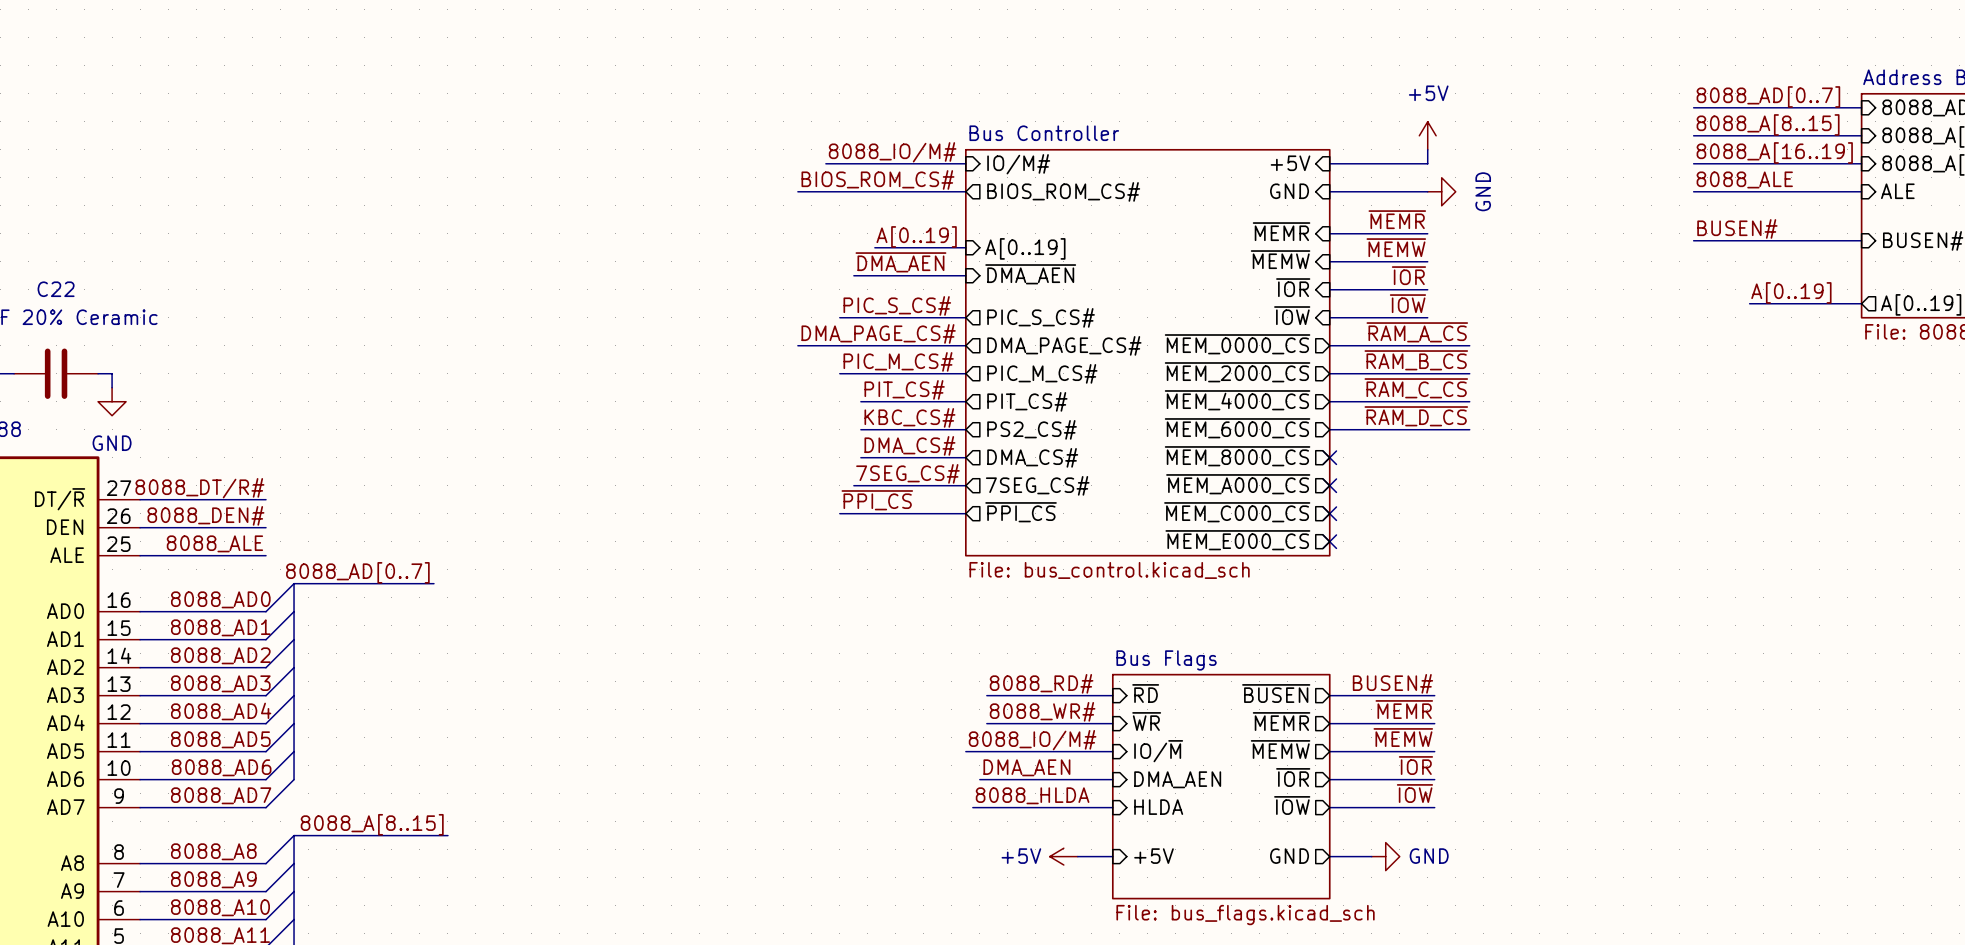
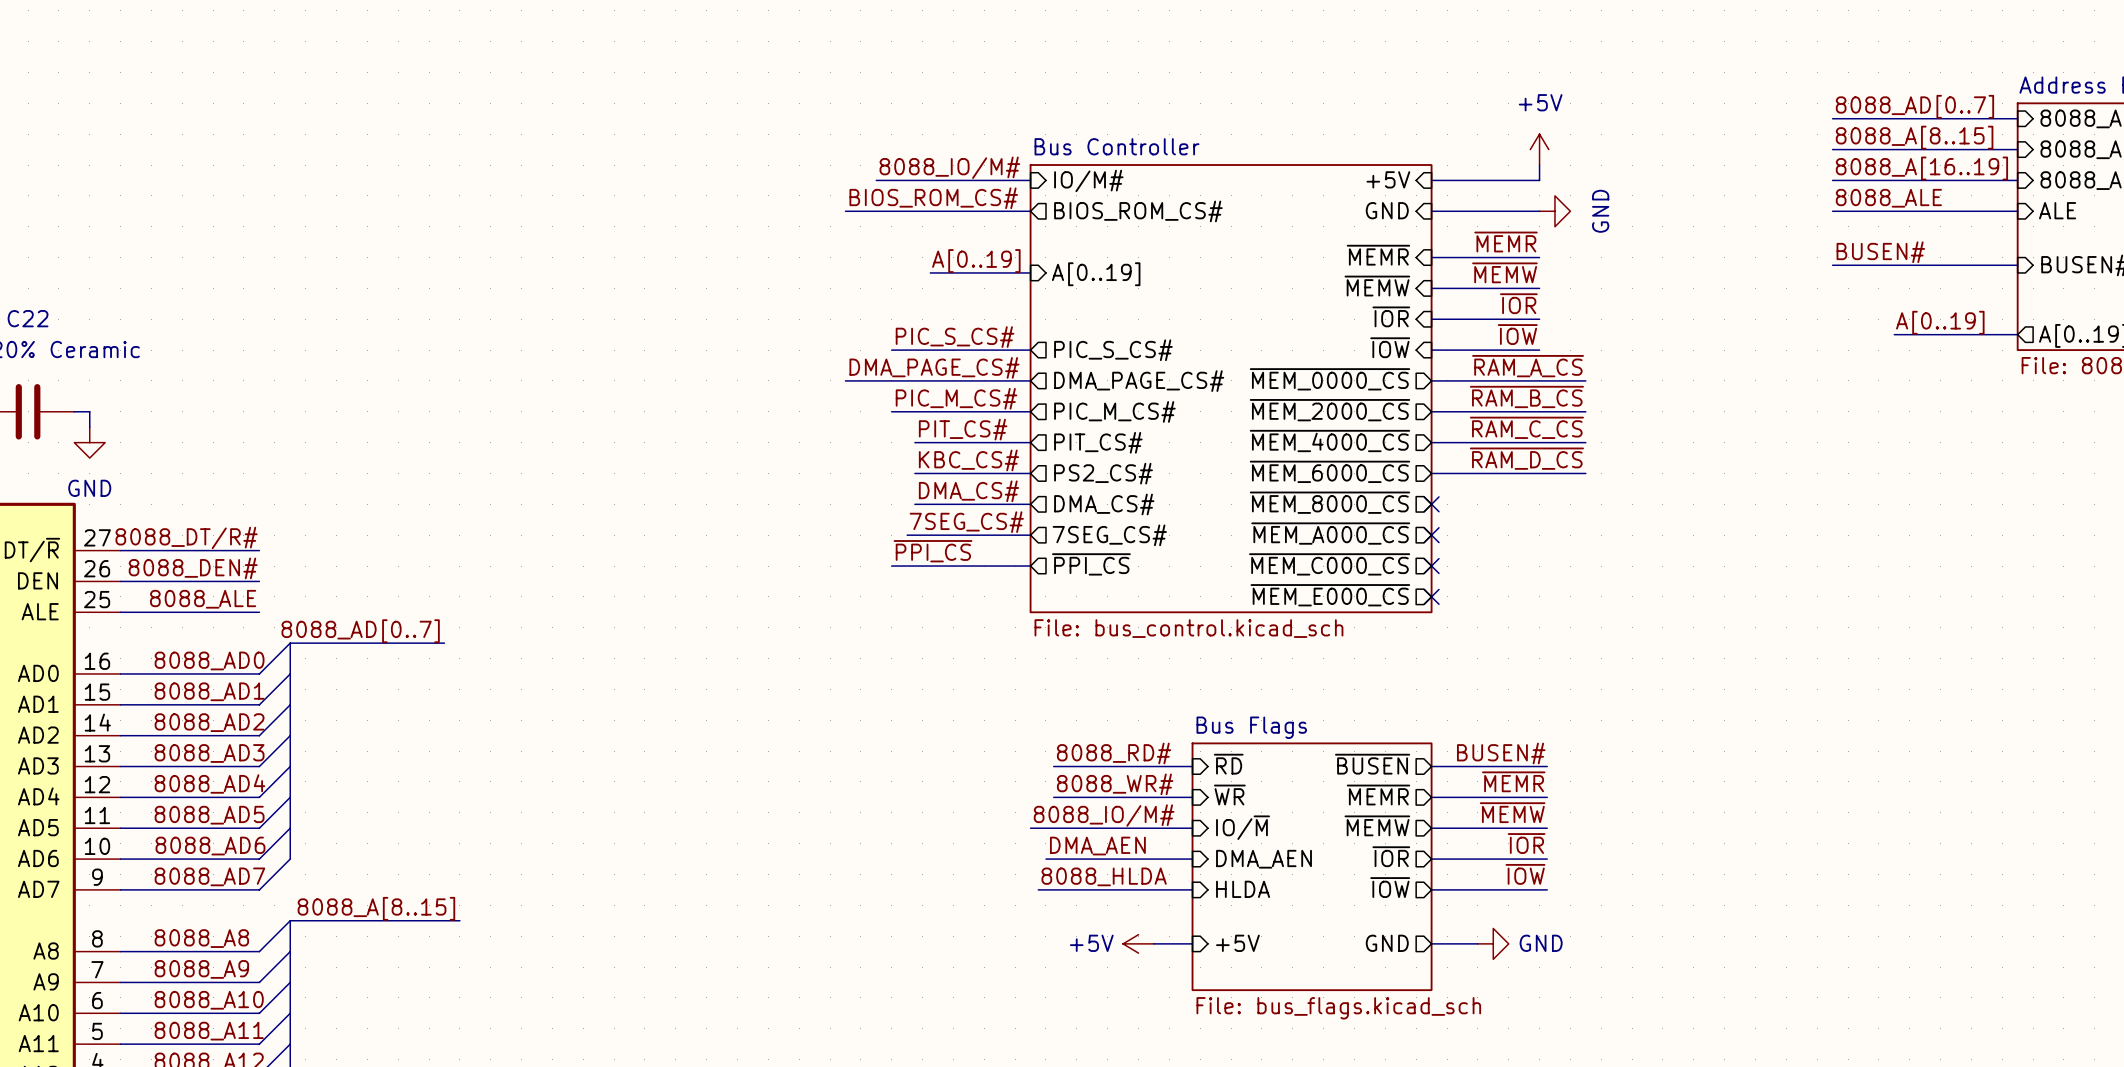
label: ~{DMA_AEN} (900, 262) -> none
sheet pin: ~{DMA_AEN} (1030, 274) -> none
wire: (853, 275) (965, 275) -> none

